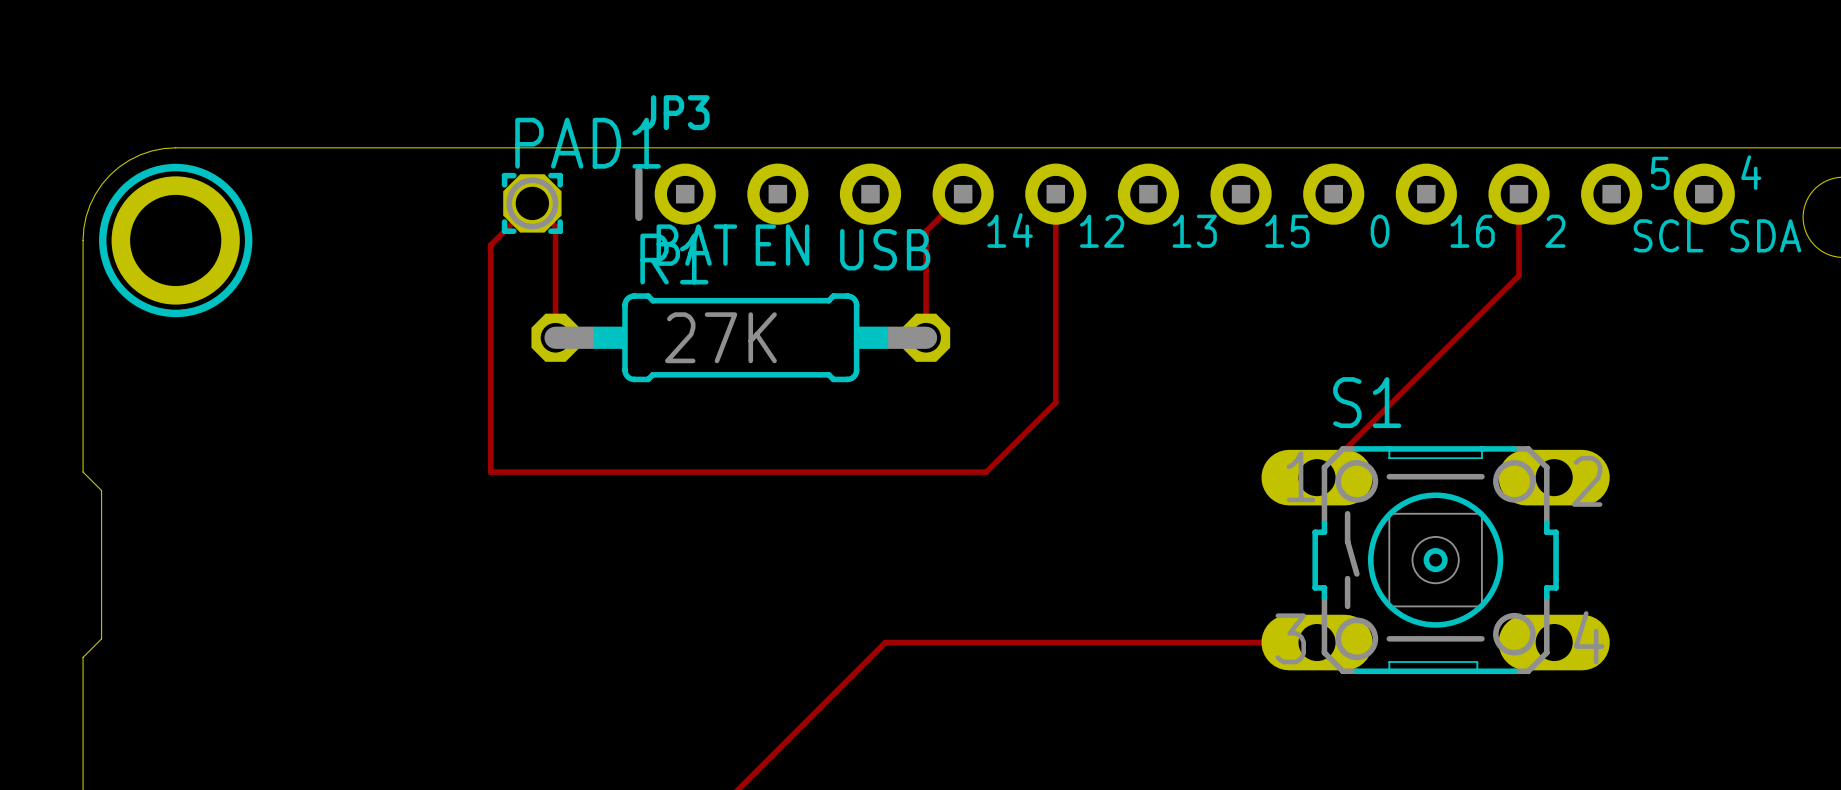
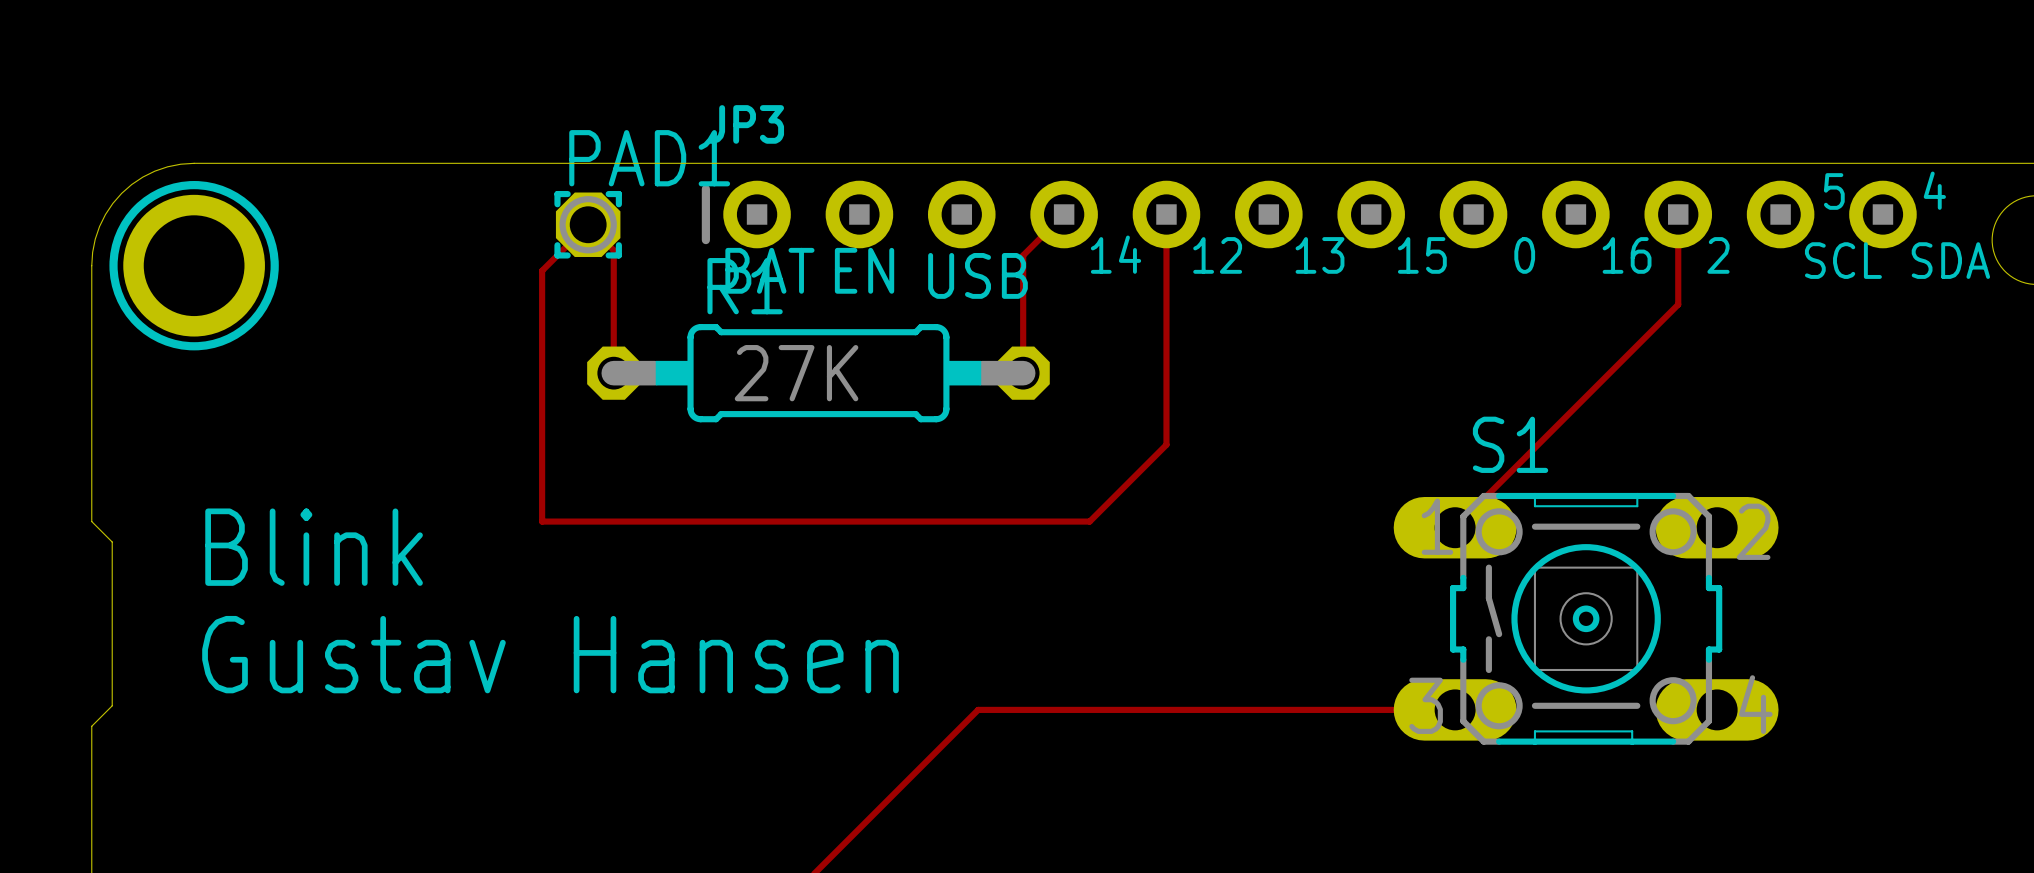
text: none -> Blink (314, 547)
text: none -> Gustav Hansen (550, 654)

